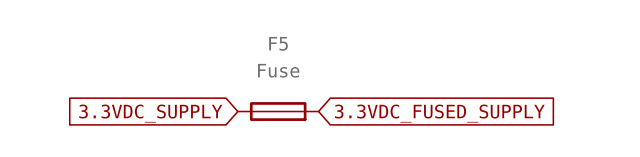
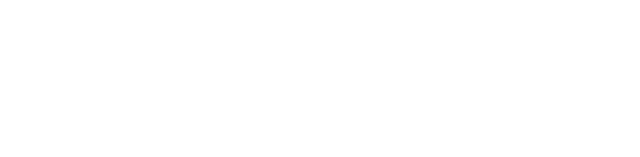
F5: Fuse (278, 111) -> none
global label: 3.3VDC_SUPPLY (150, 113) -> none
global label: 3.3VDC_FUSED_SUPPLY (439, 113) -> none

